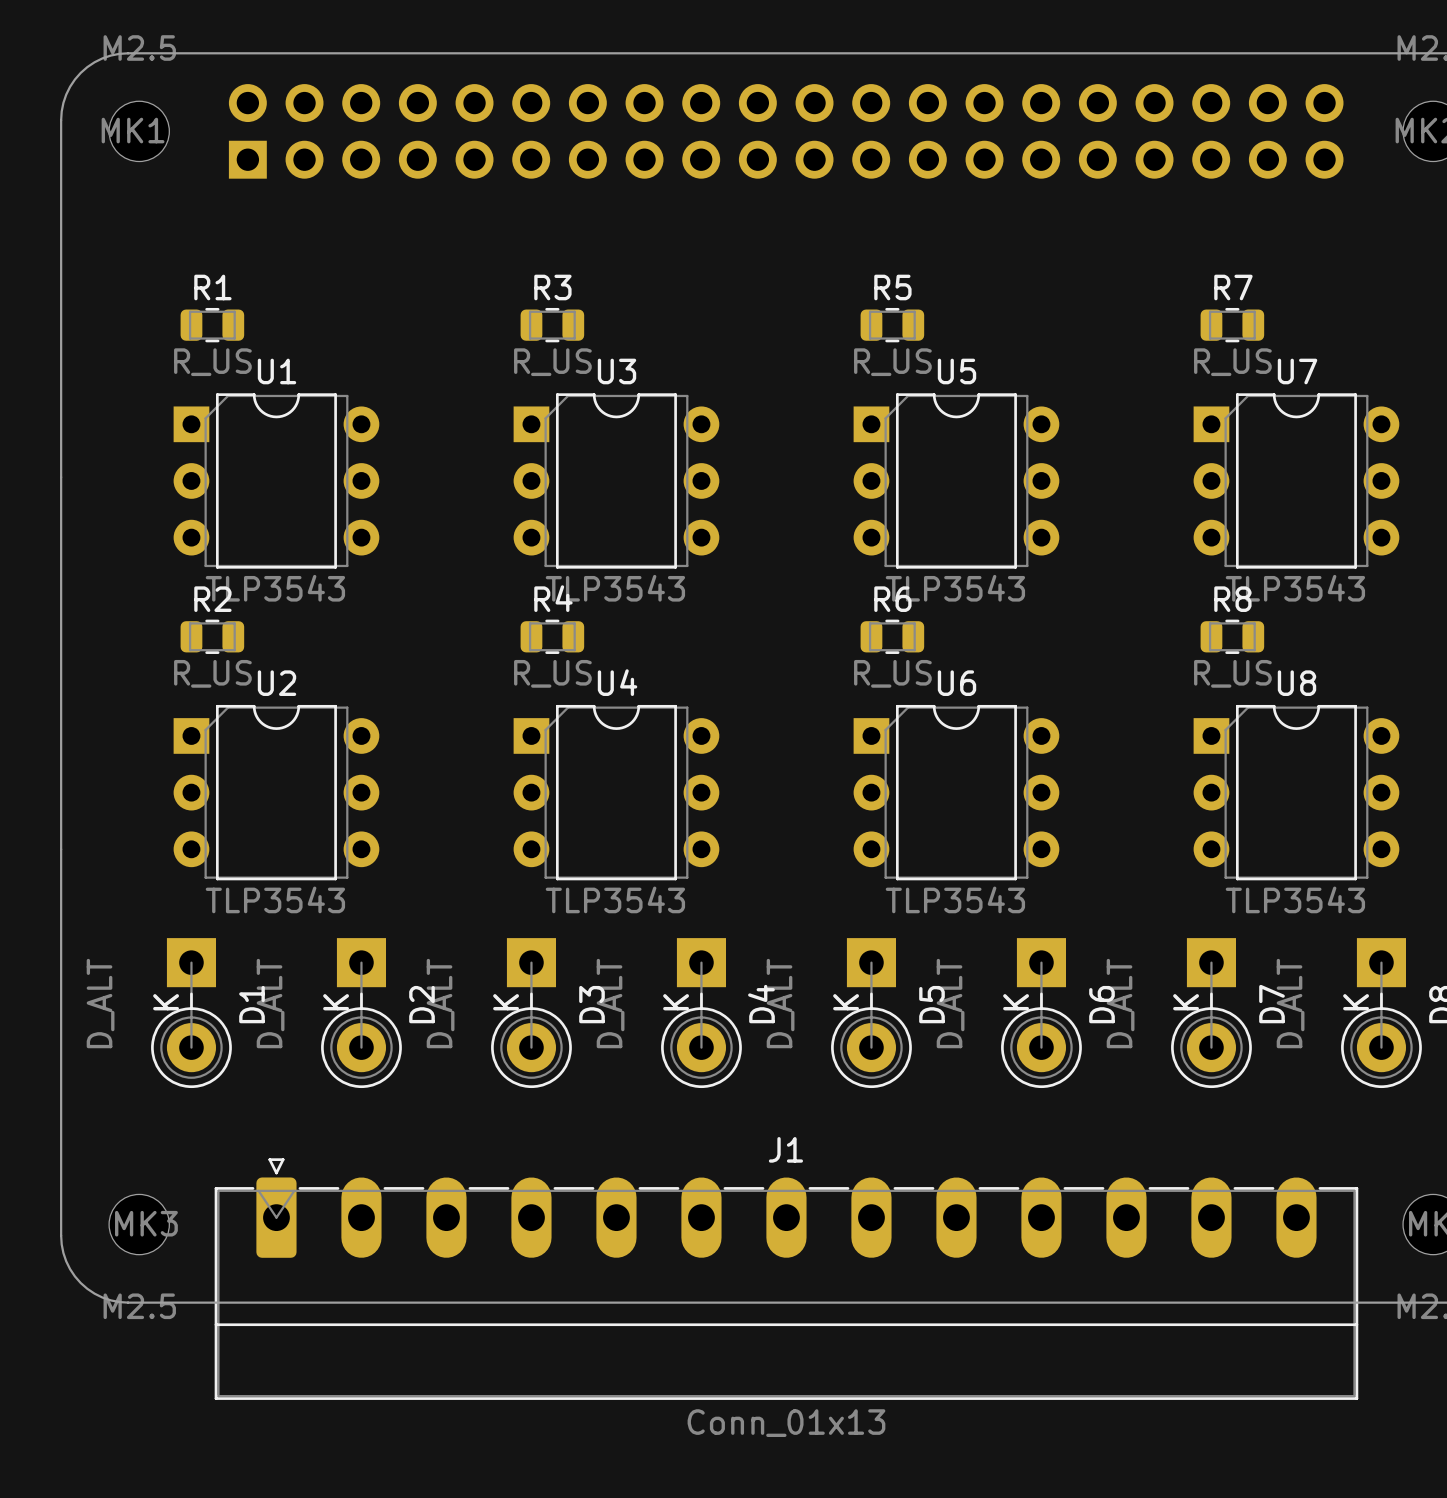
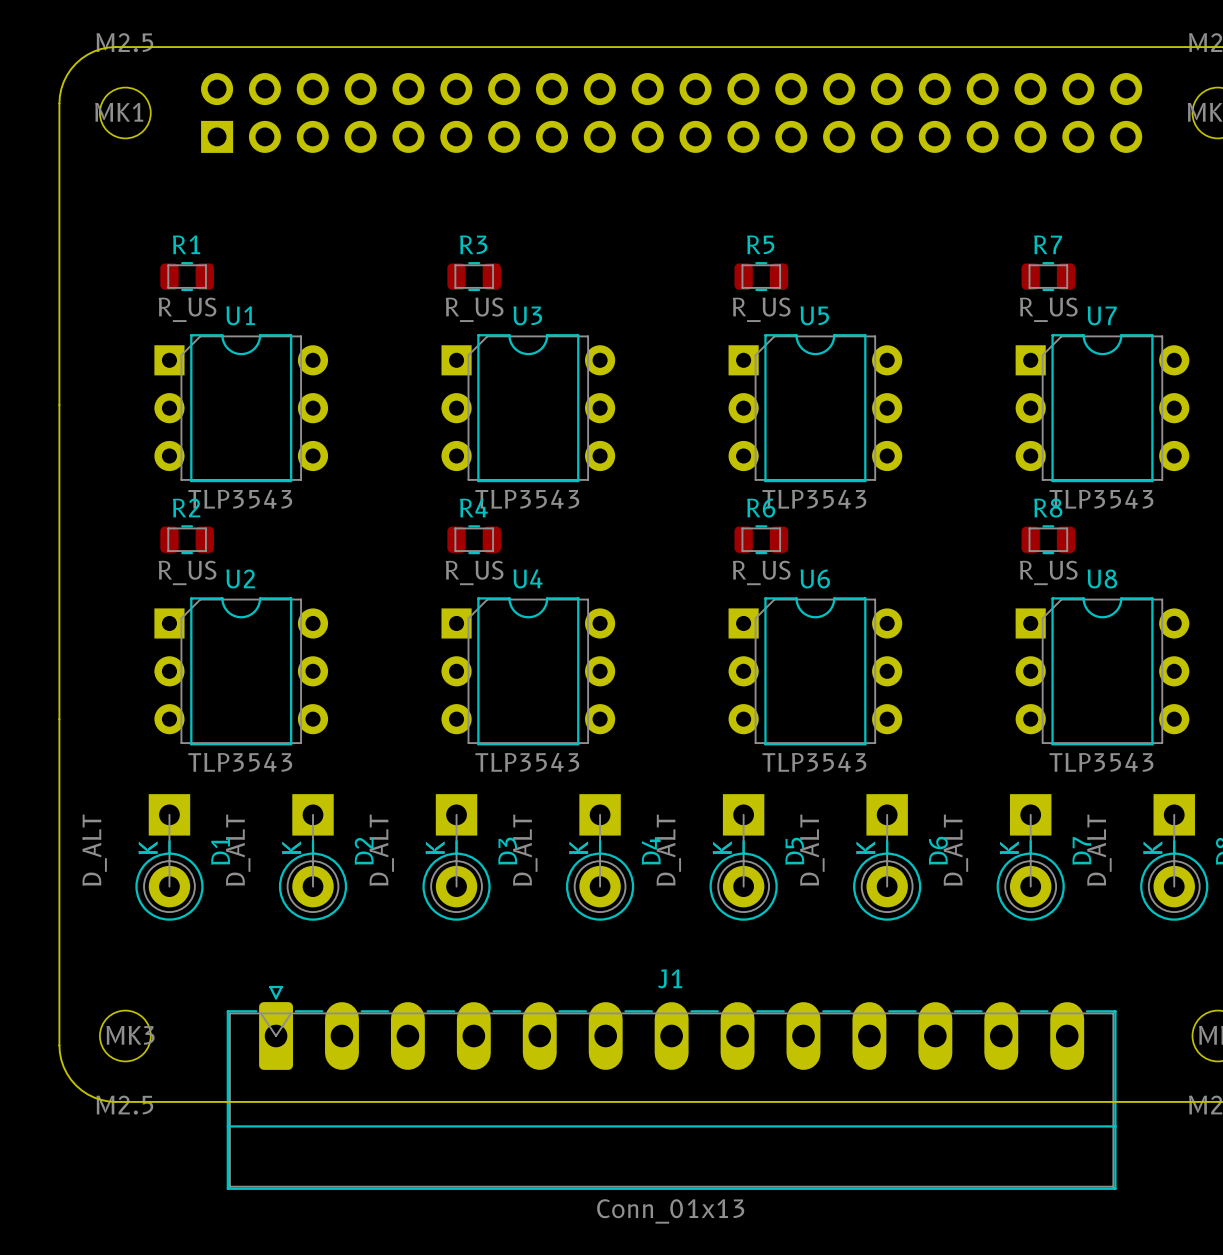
J1 footprint: [214, 1158, 1359, 1400] -> [226, 985, 1117, 1190]

